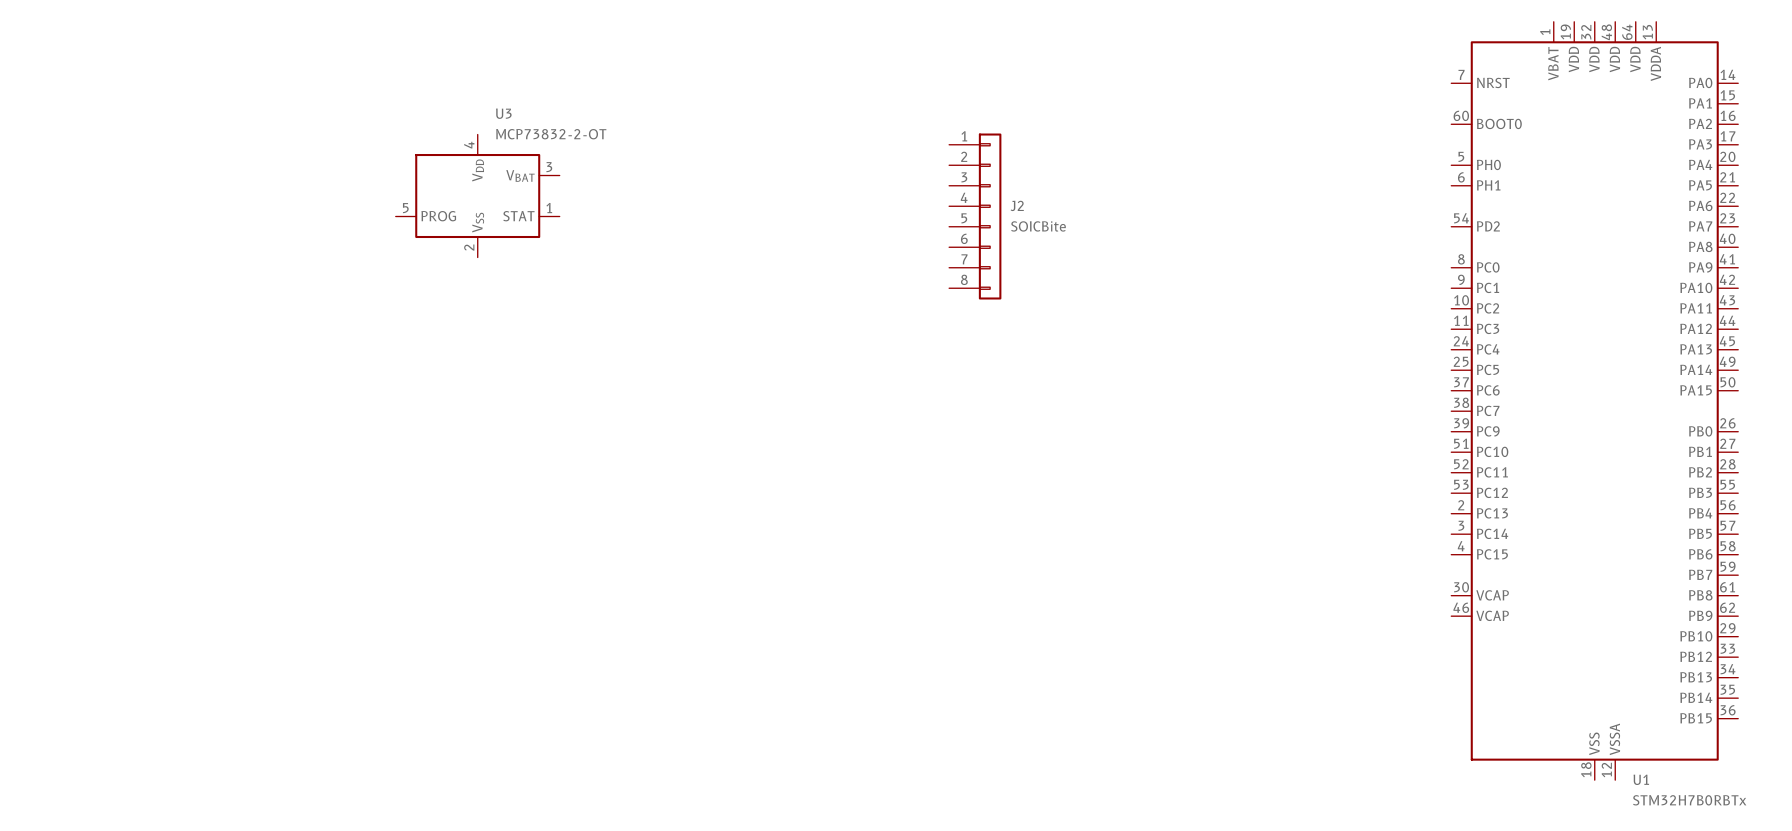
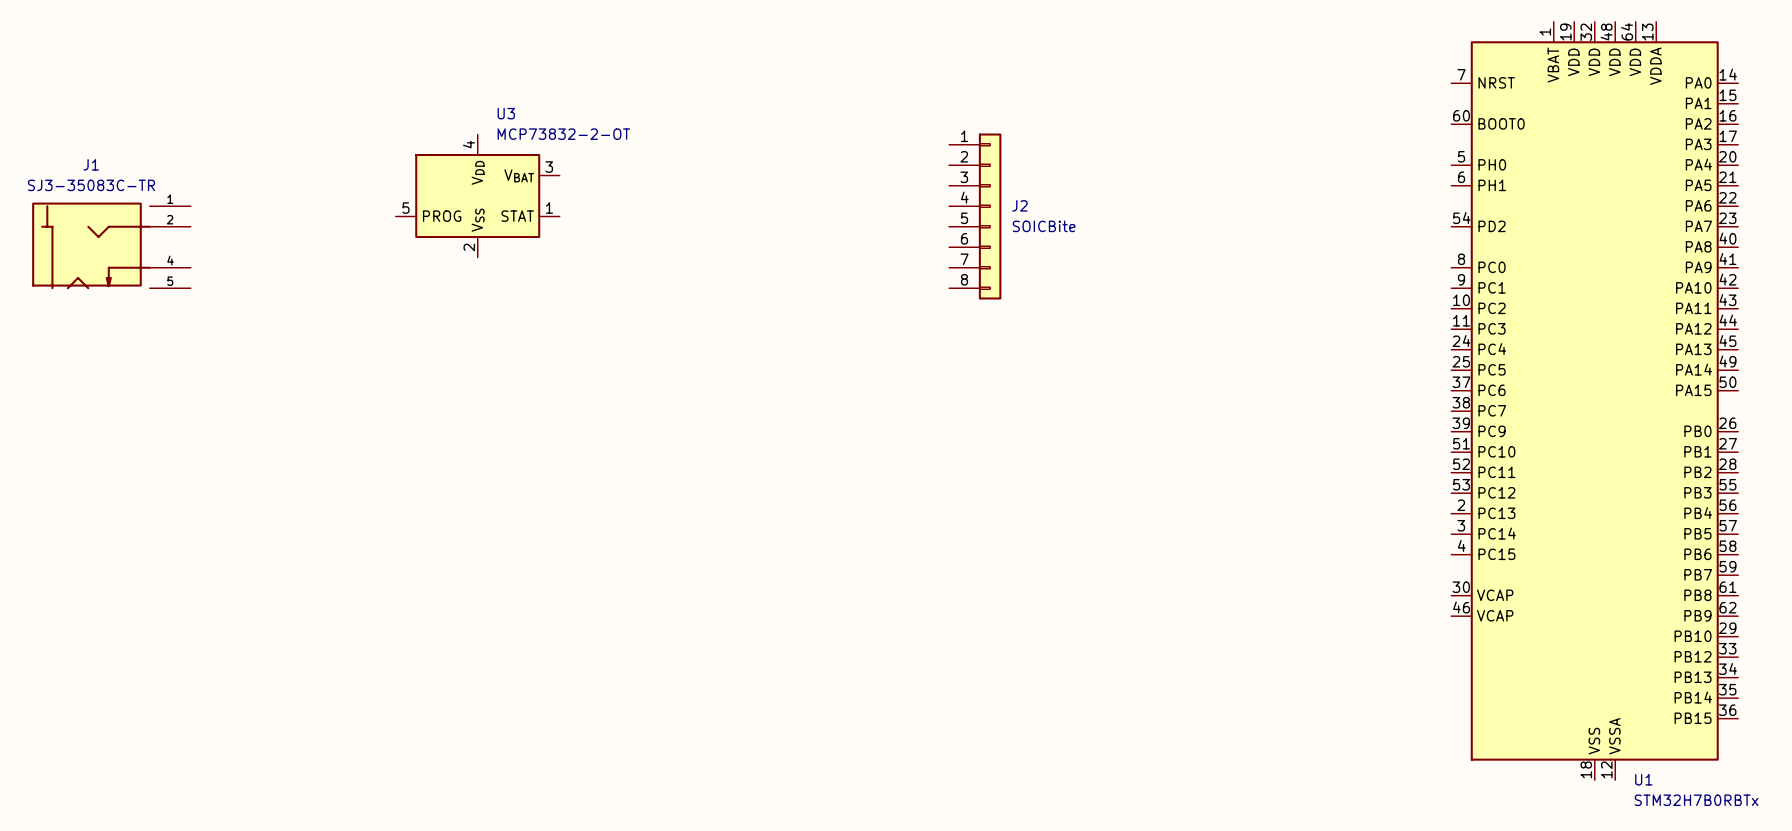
J1: none -> SJ3-35083C-TR (111, 245)

